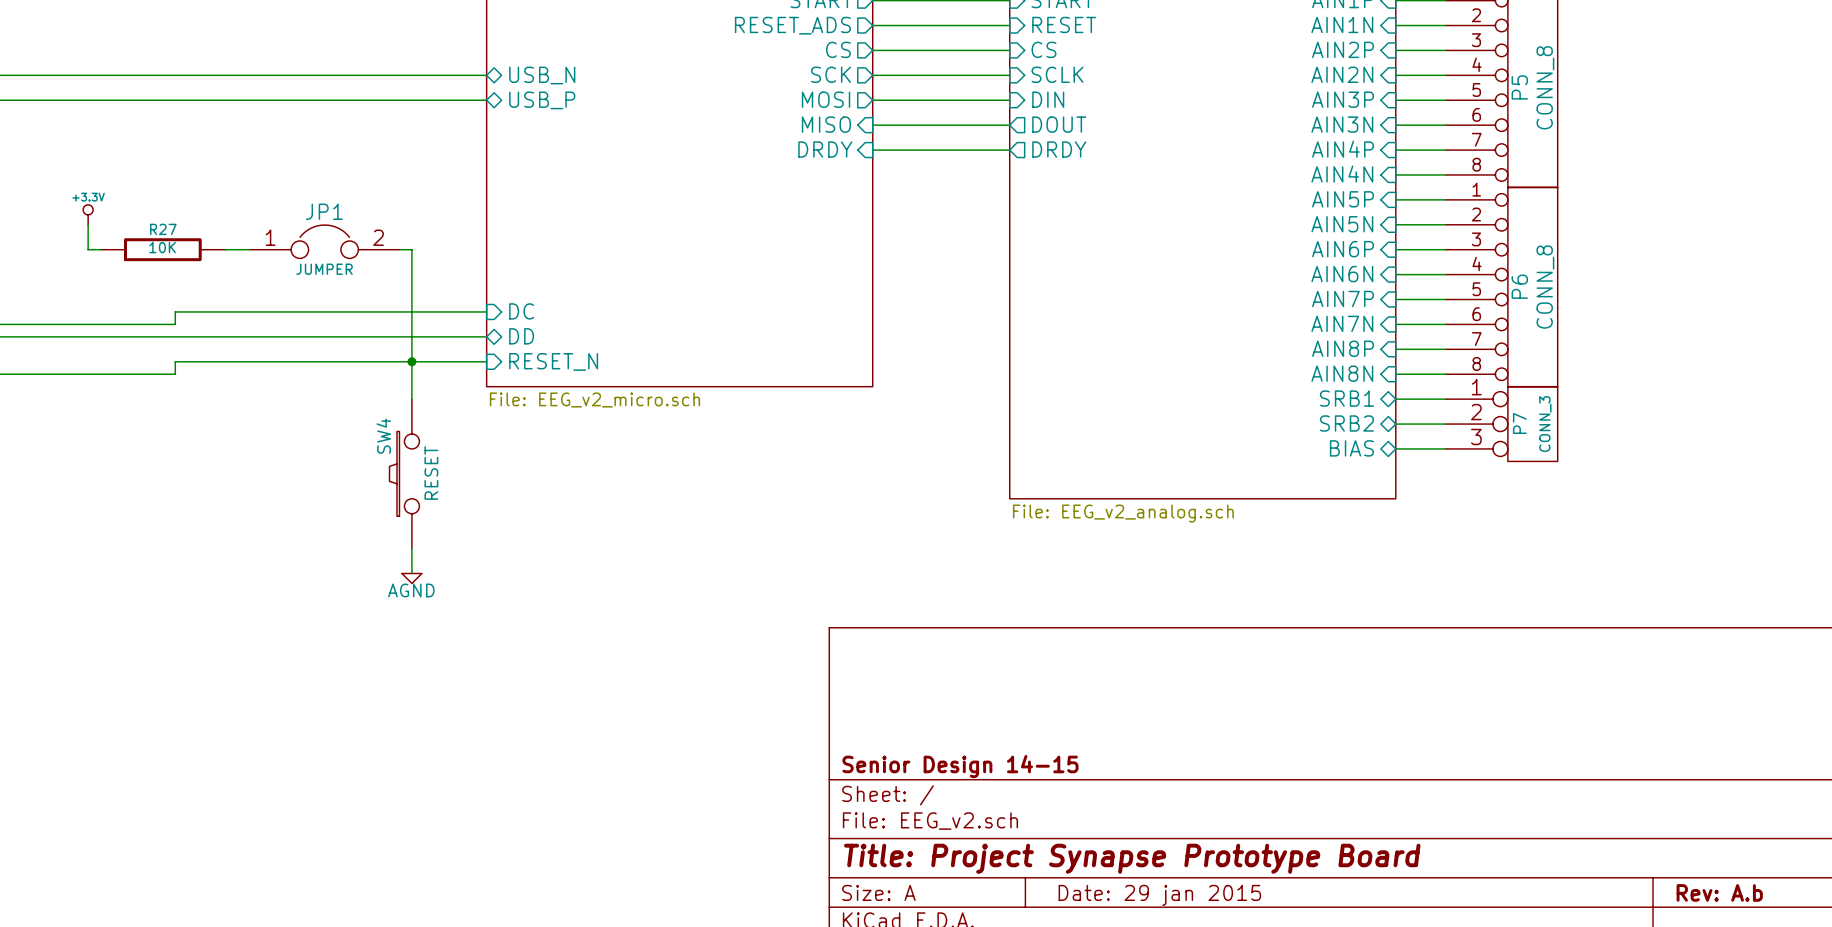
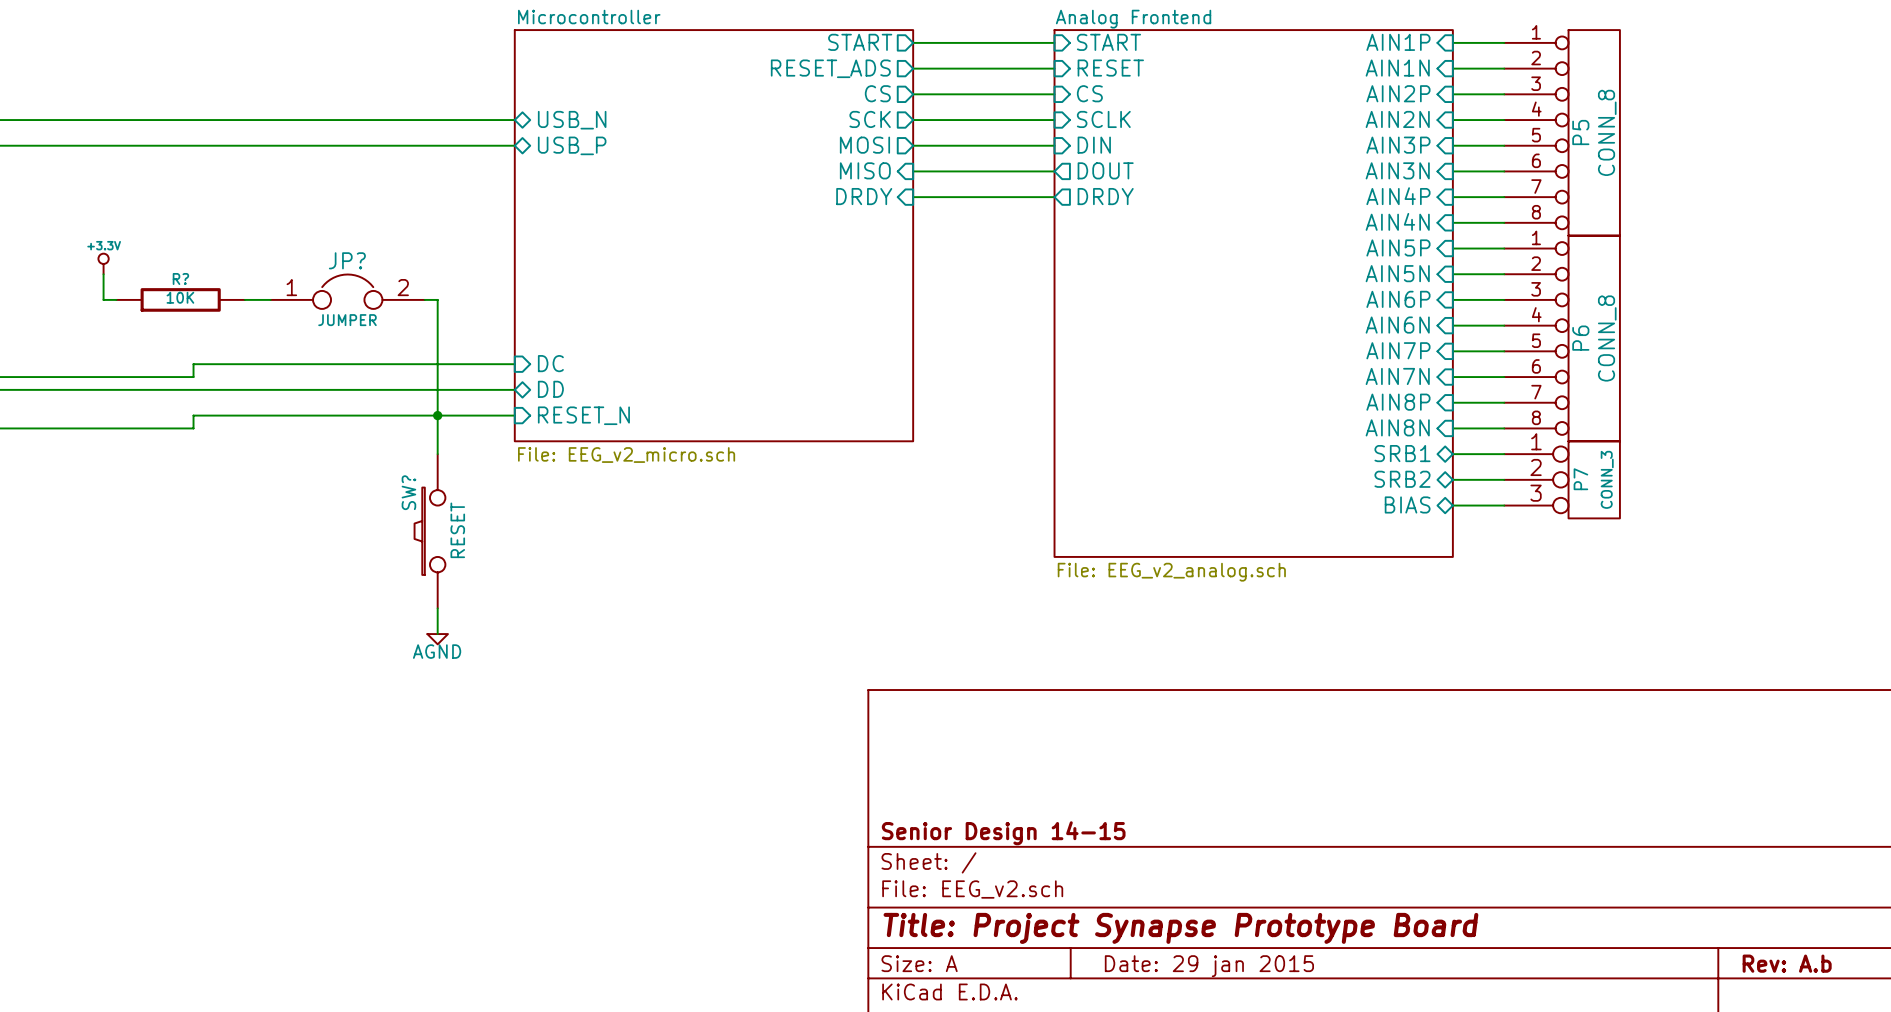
JP1 name: JP1 (324, 211) -> JP? (347, 260)
R27 name: R27 (163, 229) -> R? (180, 278)
SW4 name: SW4 (383, 436) -> SW? (408, 492)

